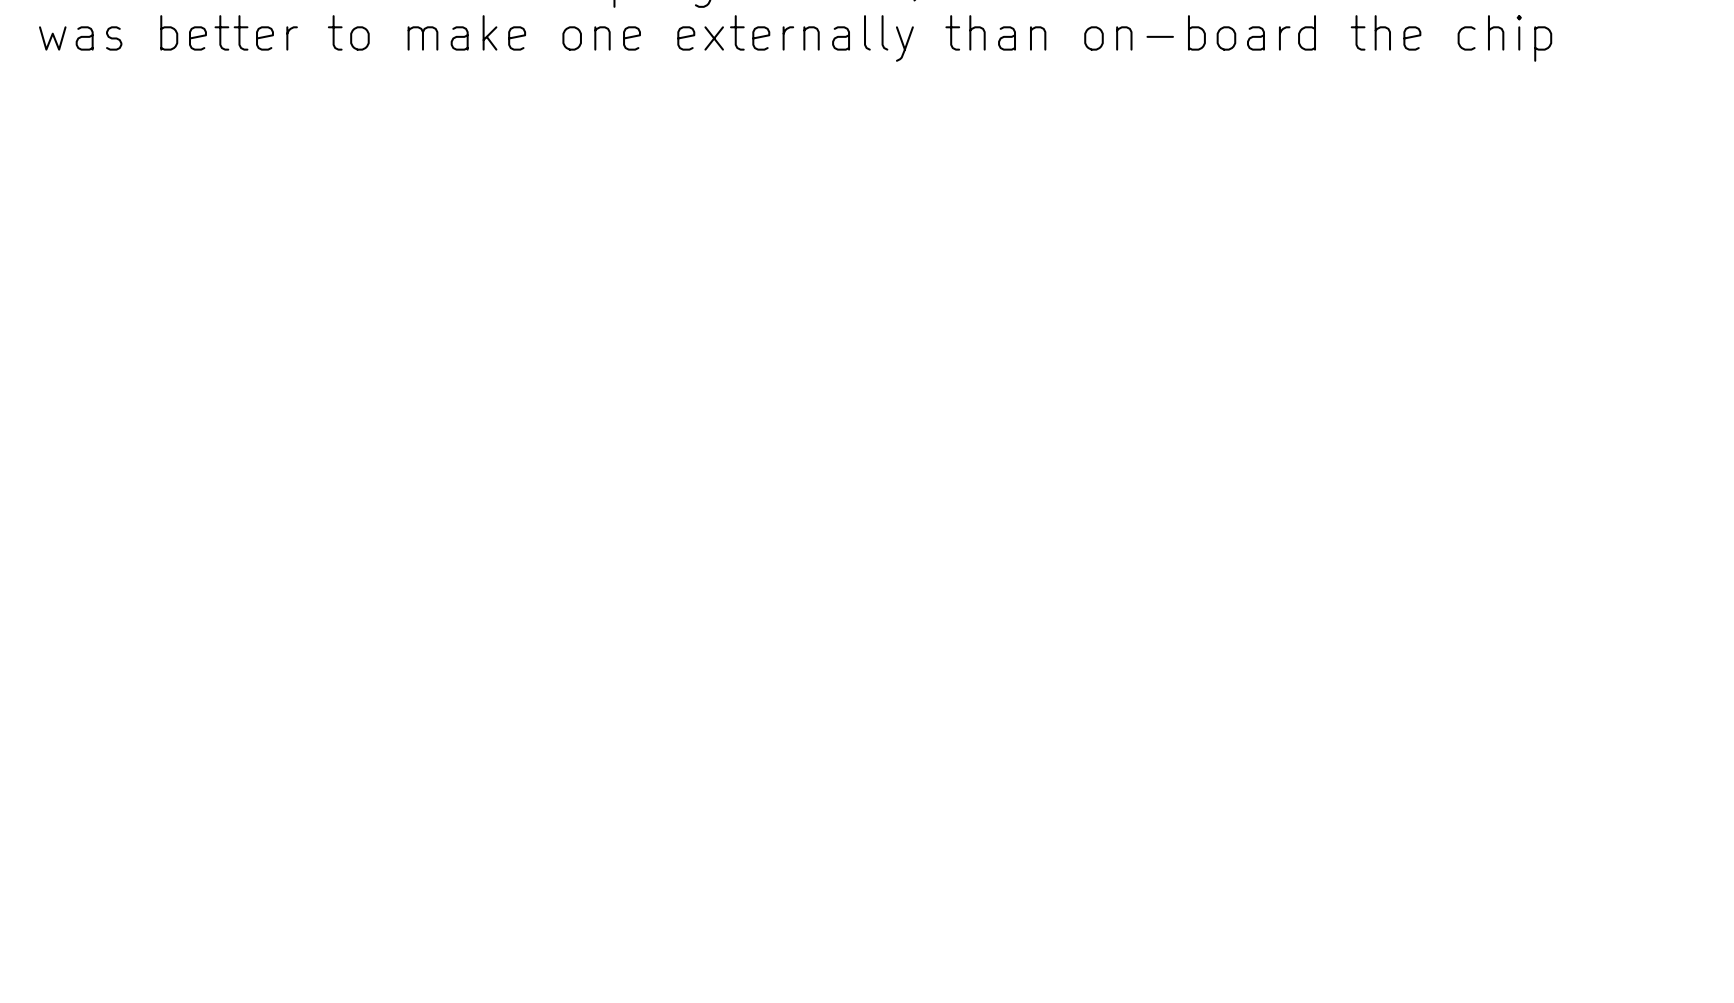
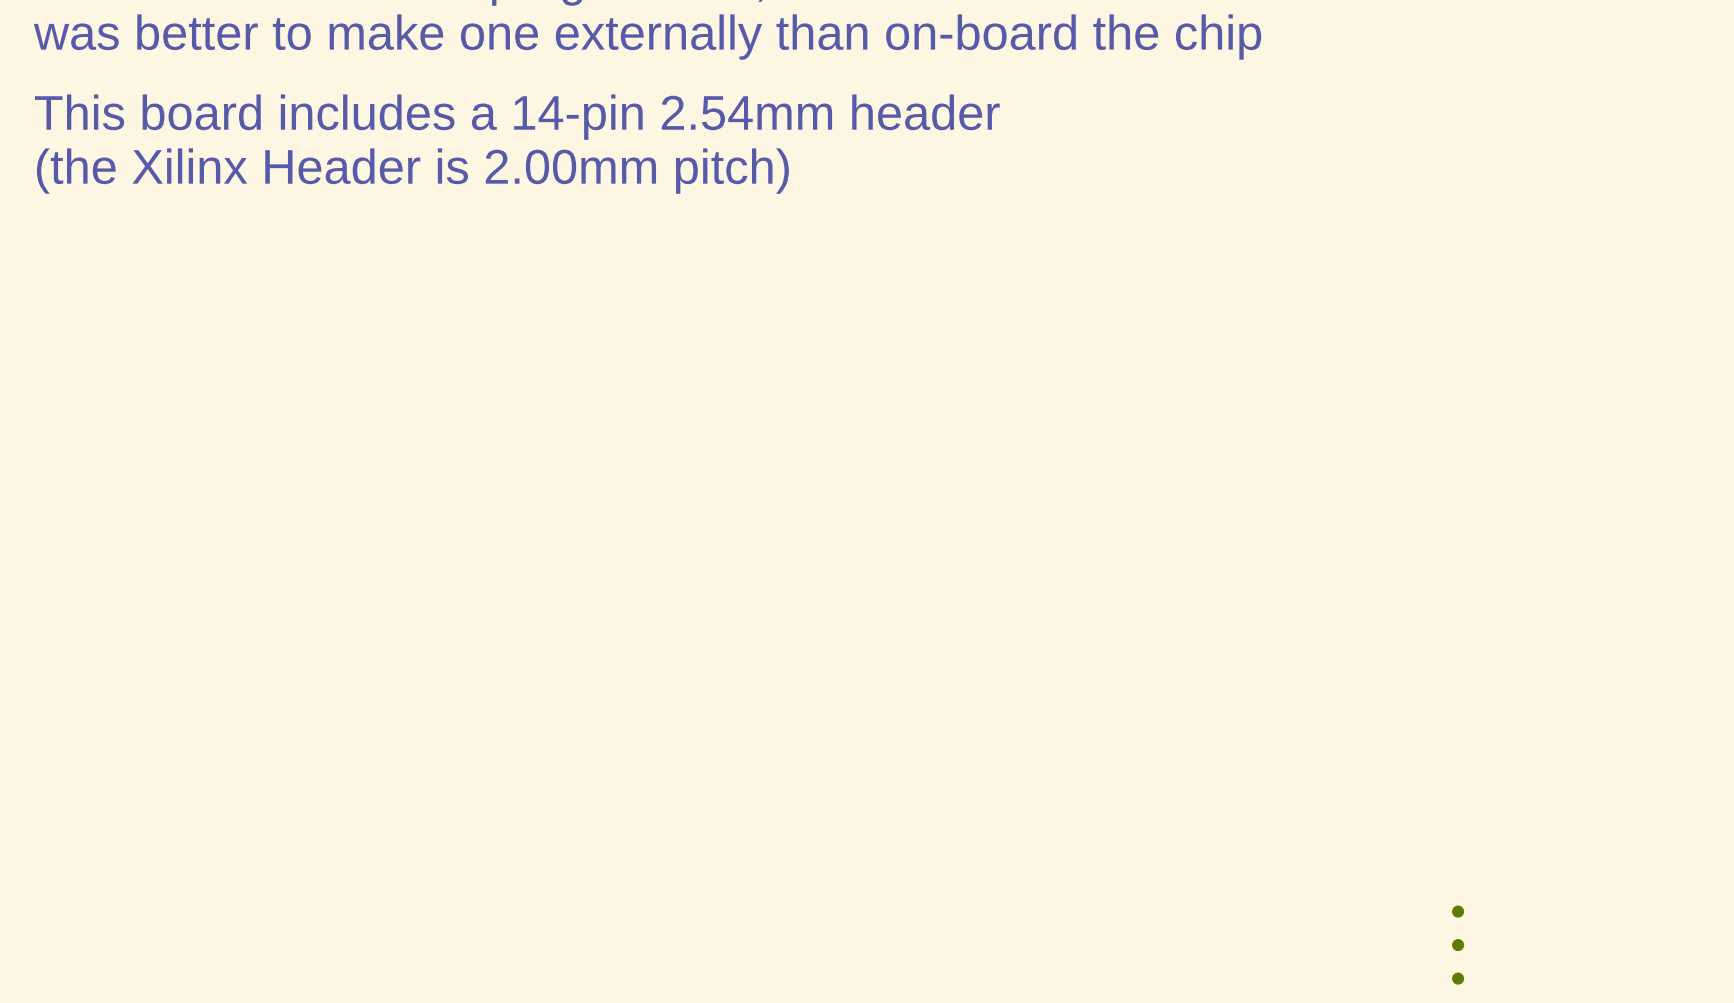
text: none -> This board includes a 14-pin 2.54mm header (517, 117)
text: none -> (the Xilinx Header is 2.00mm pitch) (412, 171)
junction: none -> (1458, 911)
junction: none -> (1458, 945)
junction: none -> (1458, 978)

